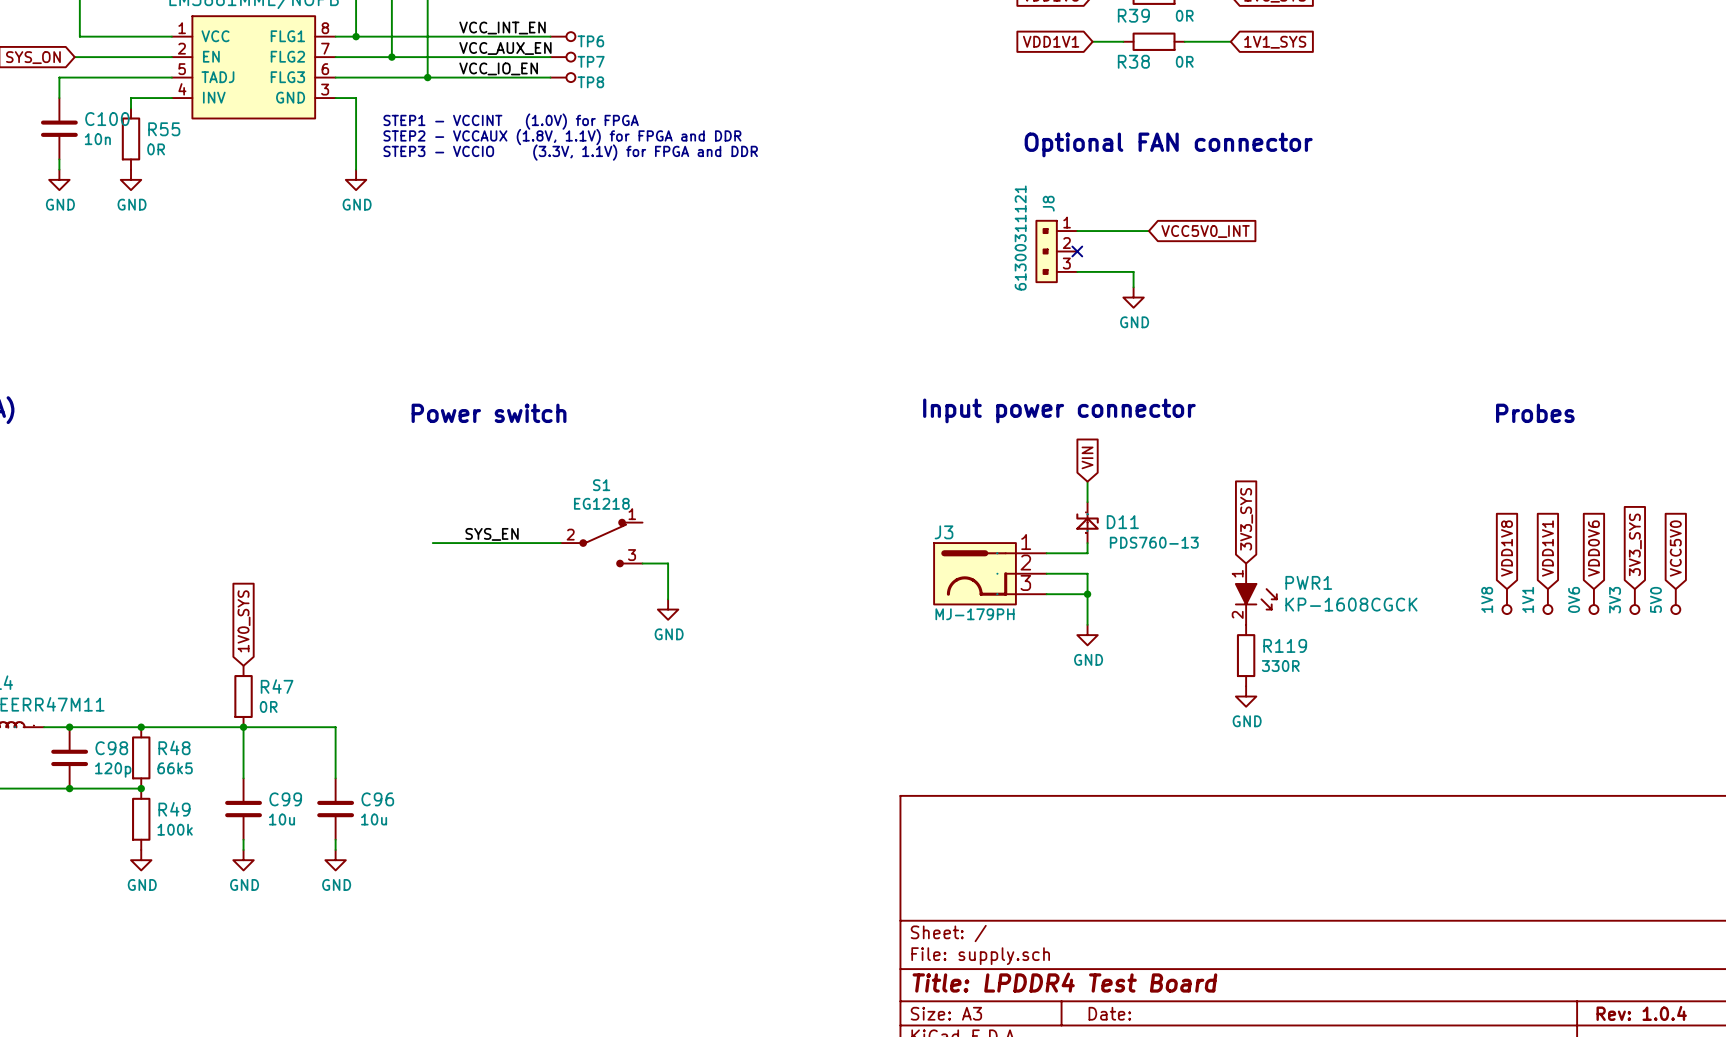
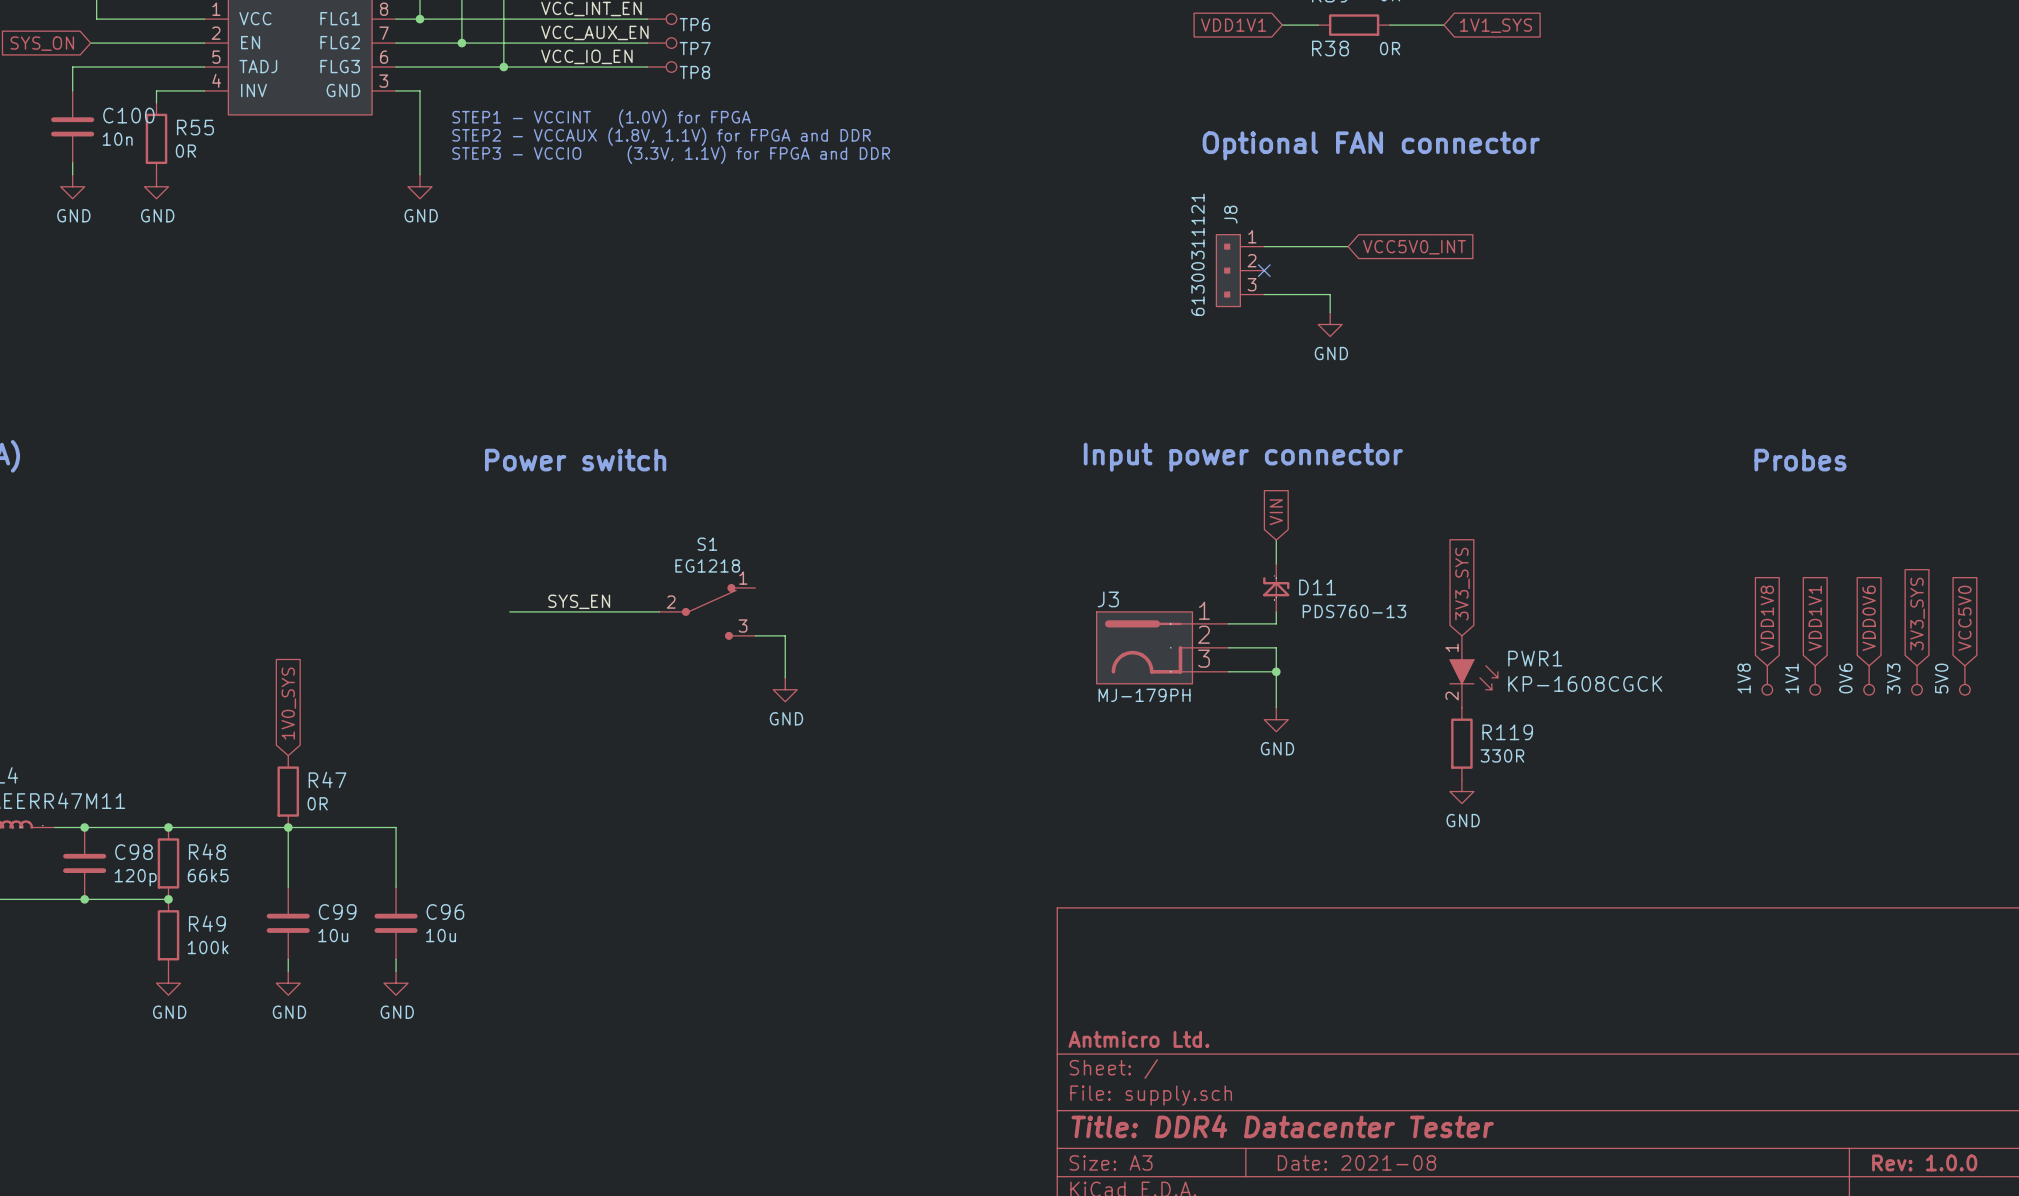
title block: none -> Antmicro Ltd. (1138, 1039)
title block: Title: LPDDR4 Test Board (1064, 982) -> Title: DDR4 Datacenter Tester (1282, 1126)
title block: Date: (1109, 1013) -> Date: 2021-08 (1356, 1162)
title block: Rev: 1.0.4 (1641, 1013) -> Rev: 1.0.0 (1924, 1162)

